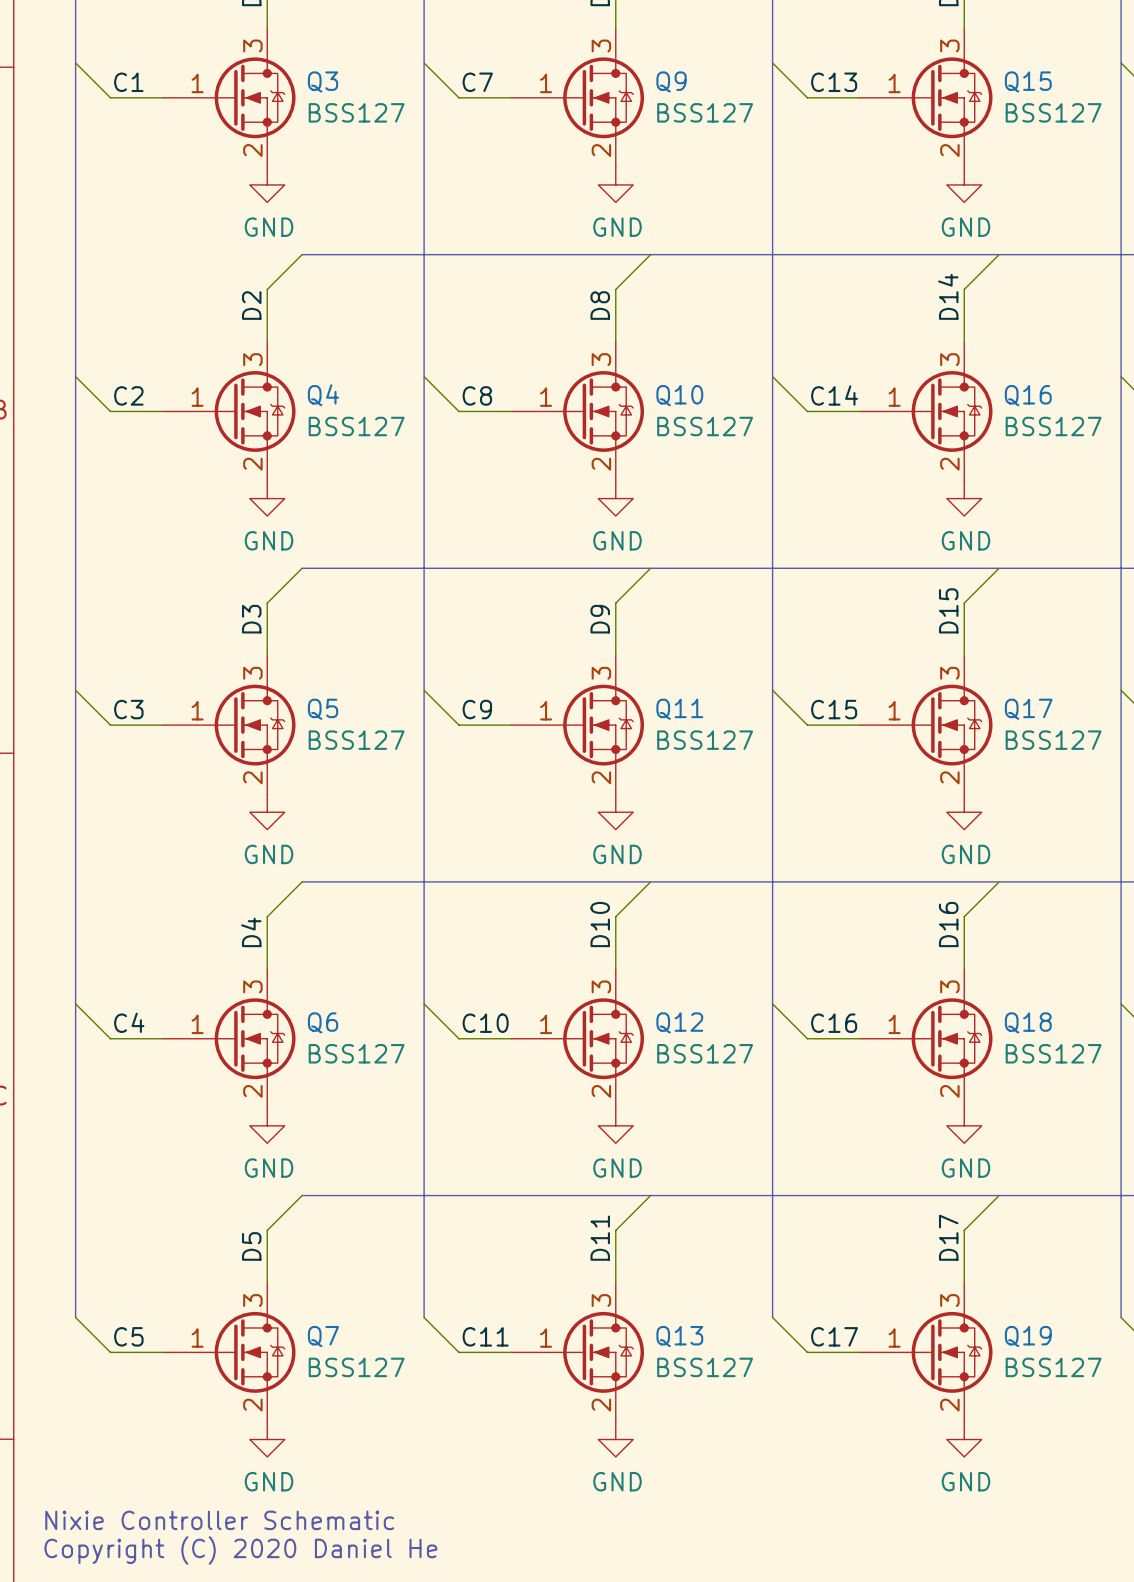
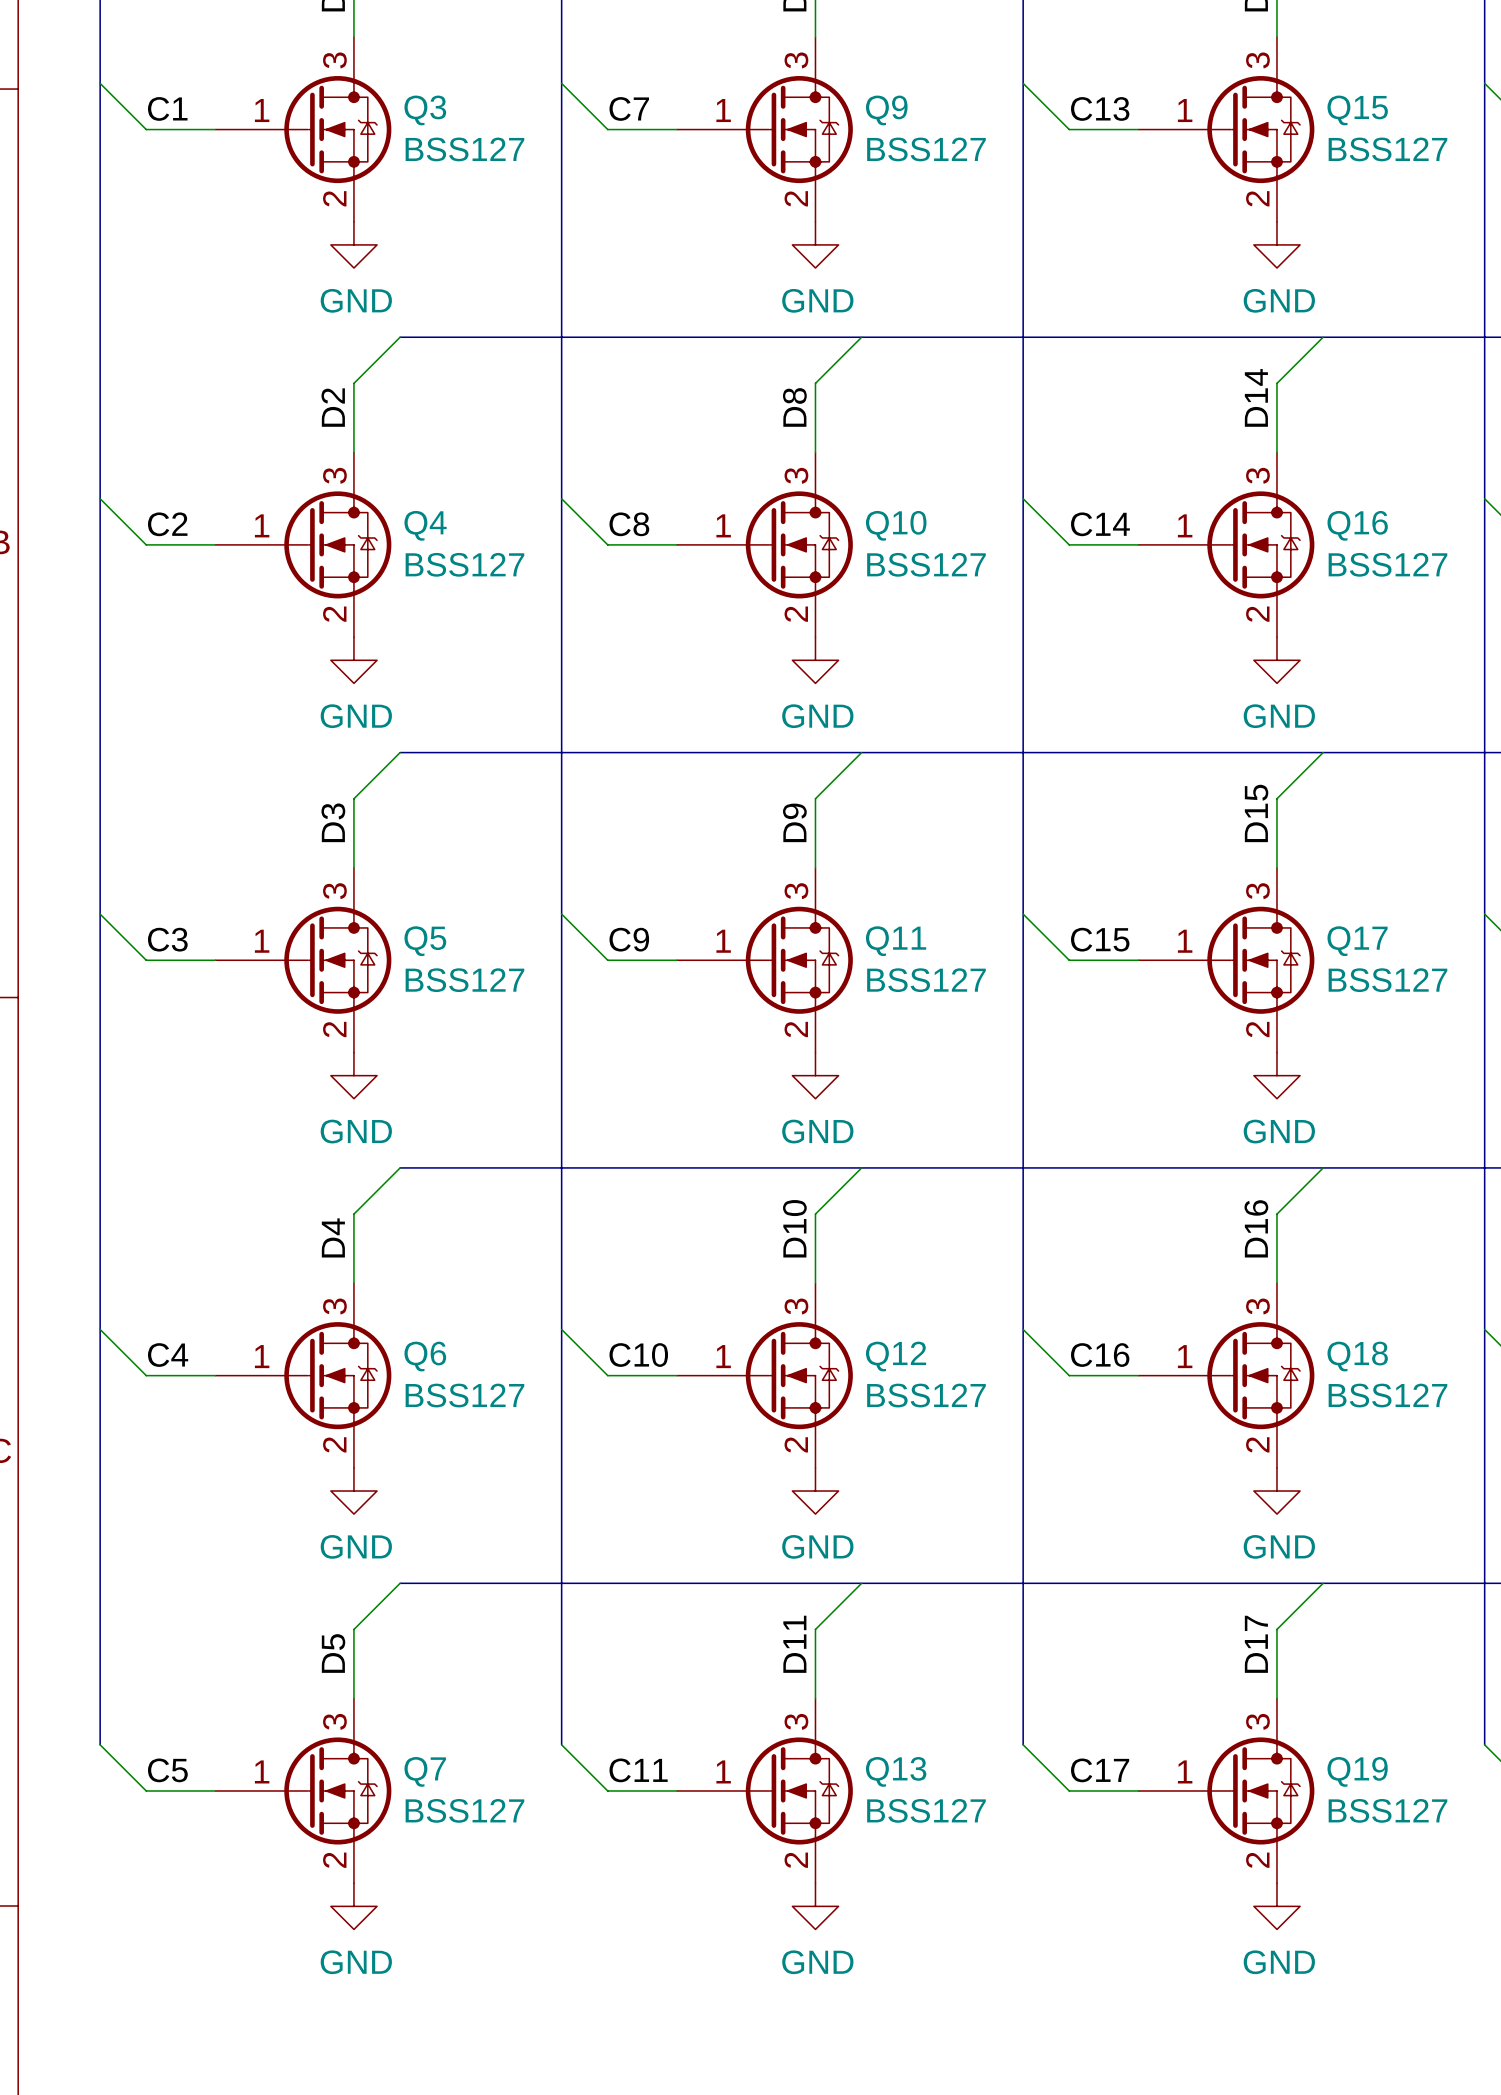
text: Nixie Controller Schematic (219, 1520) -> none
text: Copyright (C) 2020 Daniel He (240, 1550) -> none

